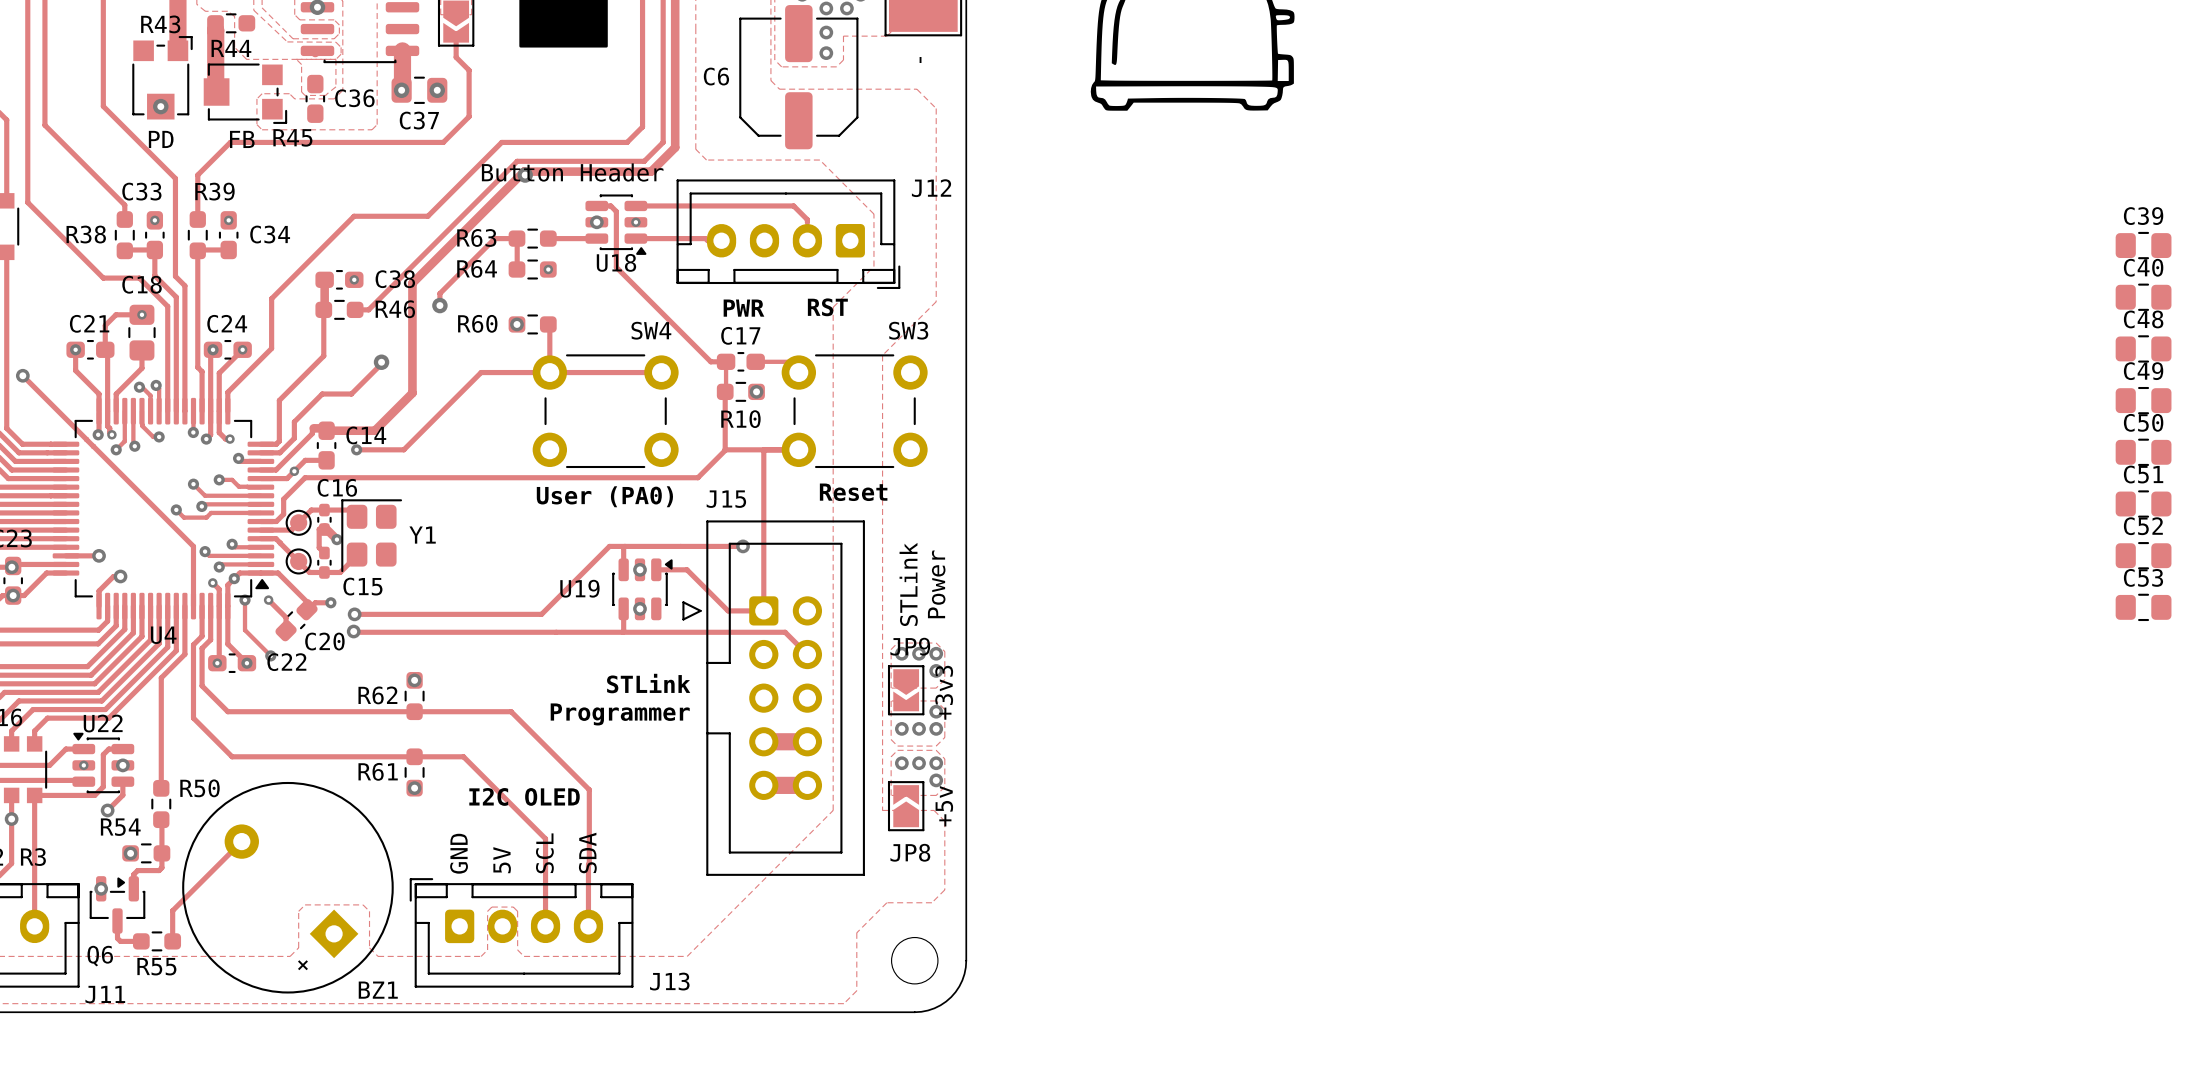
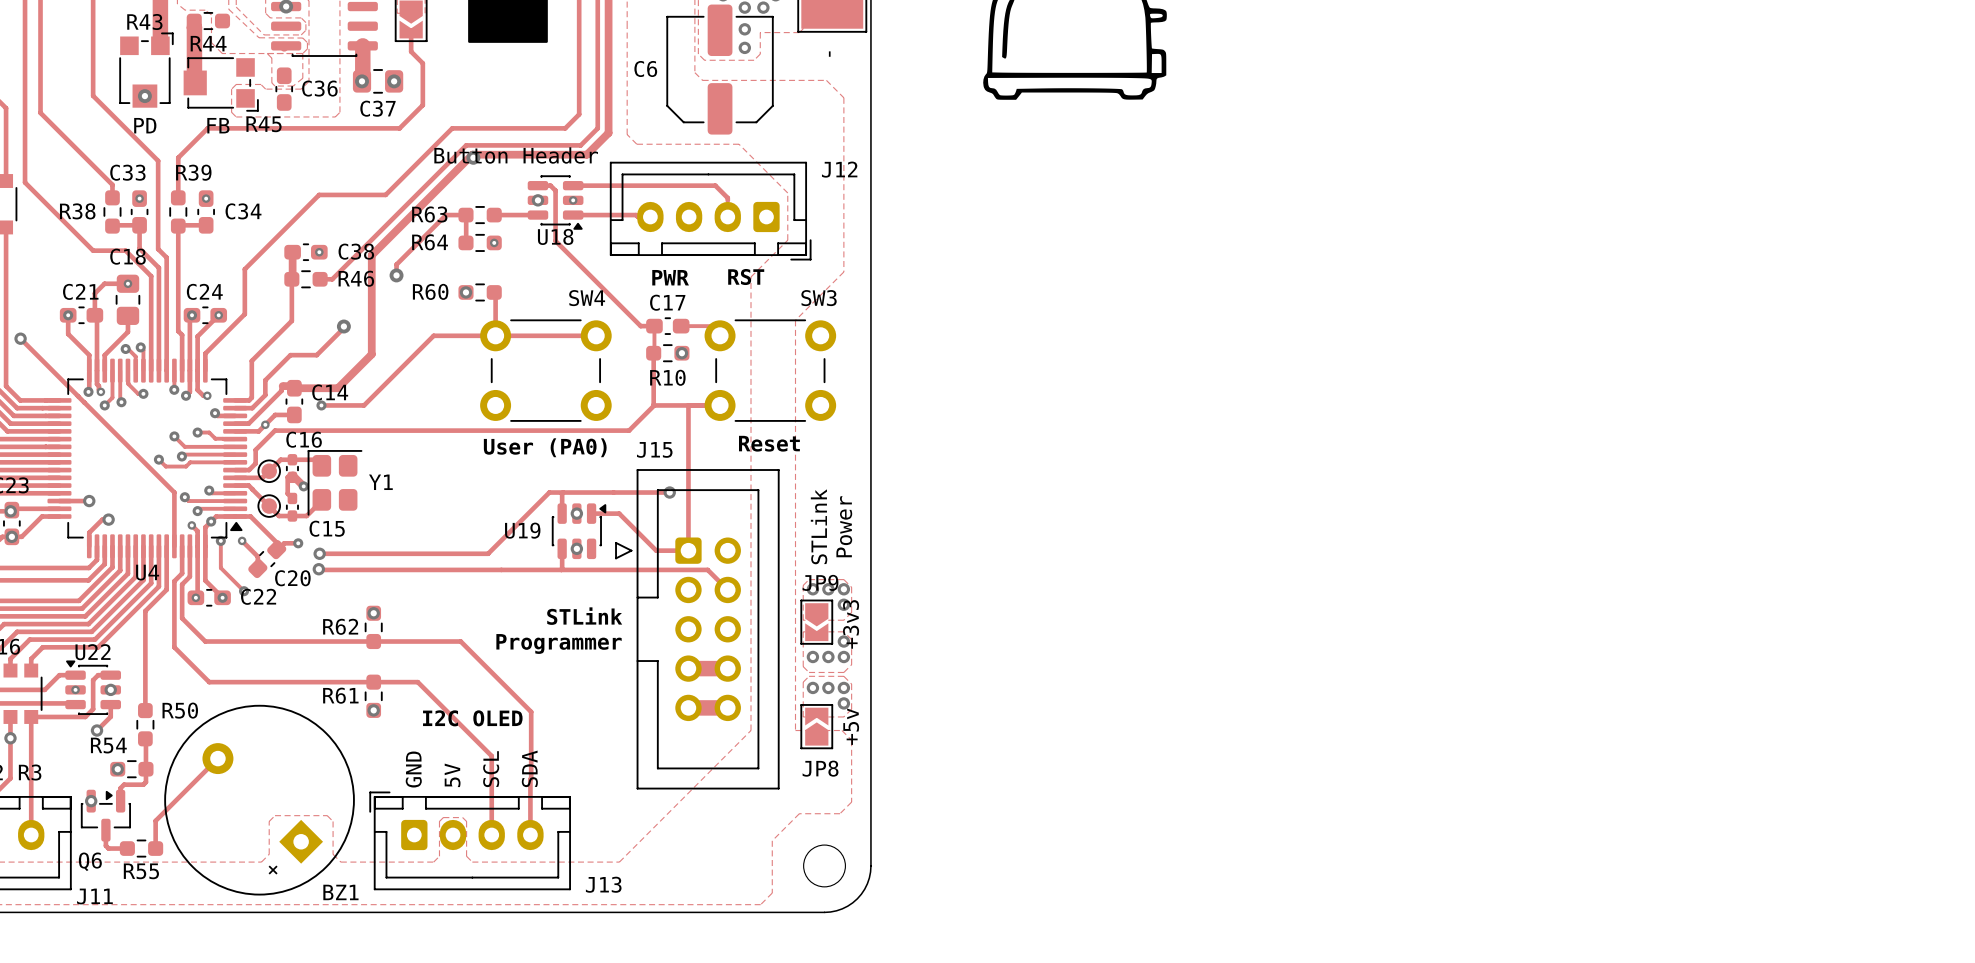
C39: (2143, 245) -> none
C40: (2143, 297) -> none
C48: (2143, 348) -> none
C49: (2143, 400) -> none
C50: (2143, 452) -> none
C51: (2143, 504) -> none
C52: (2143, 555) -> none
C53: (2143, 607) -> none

